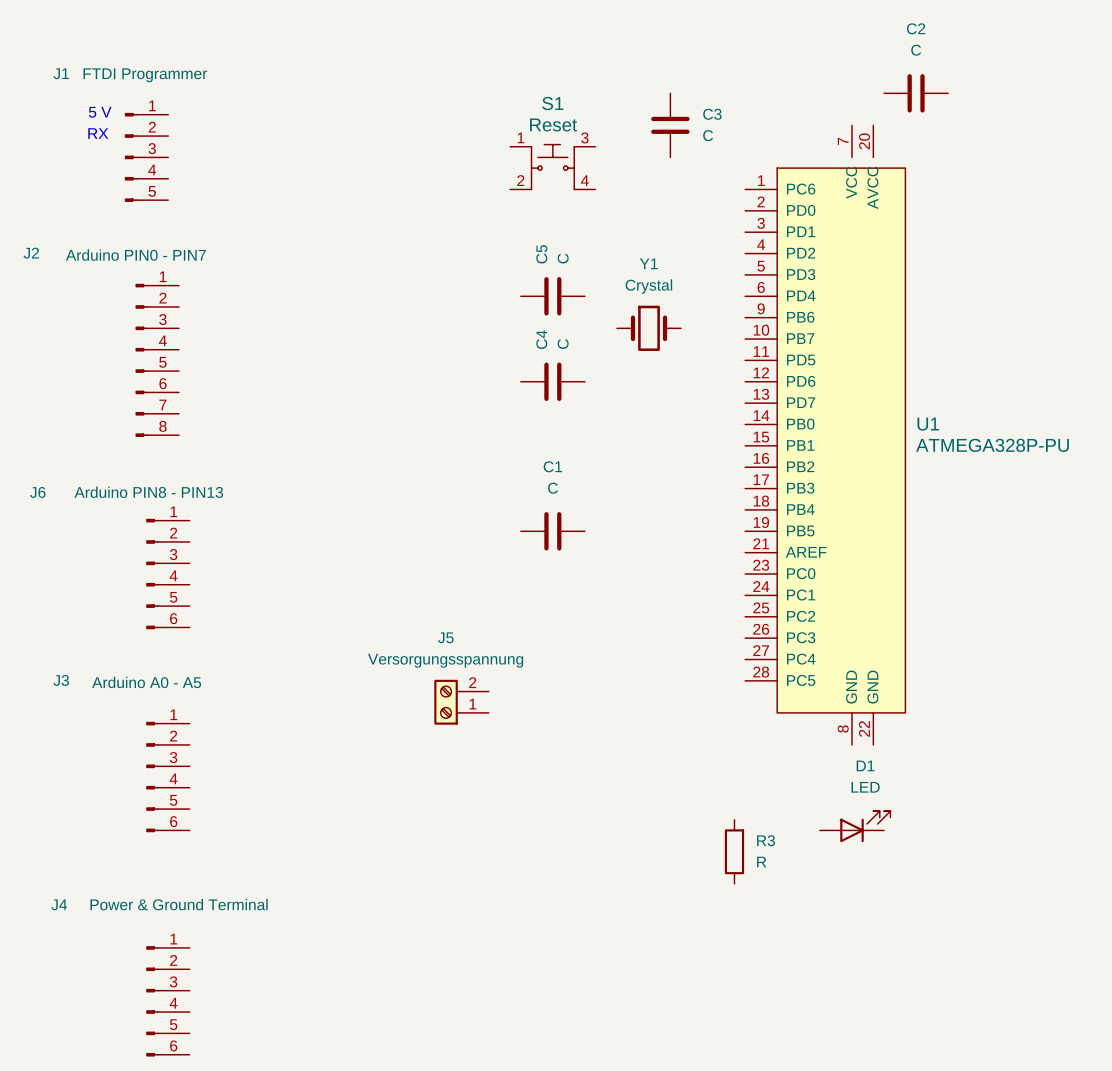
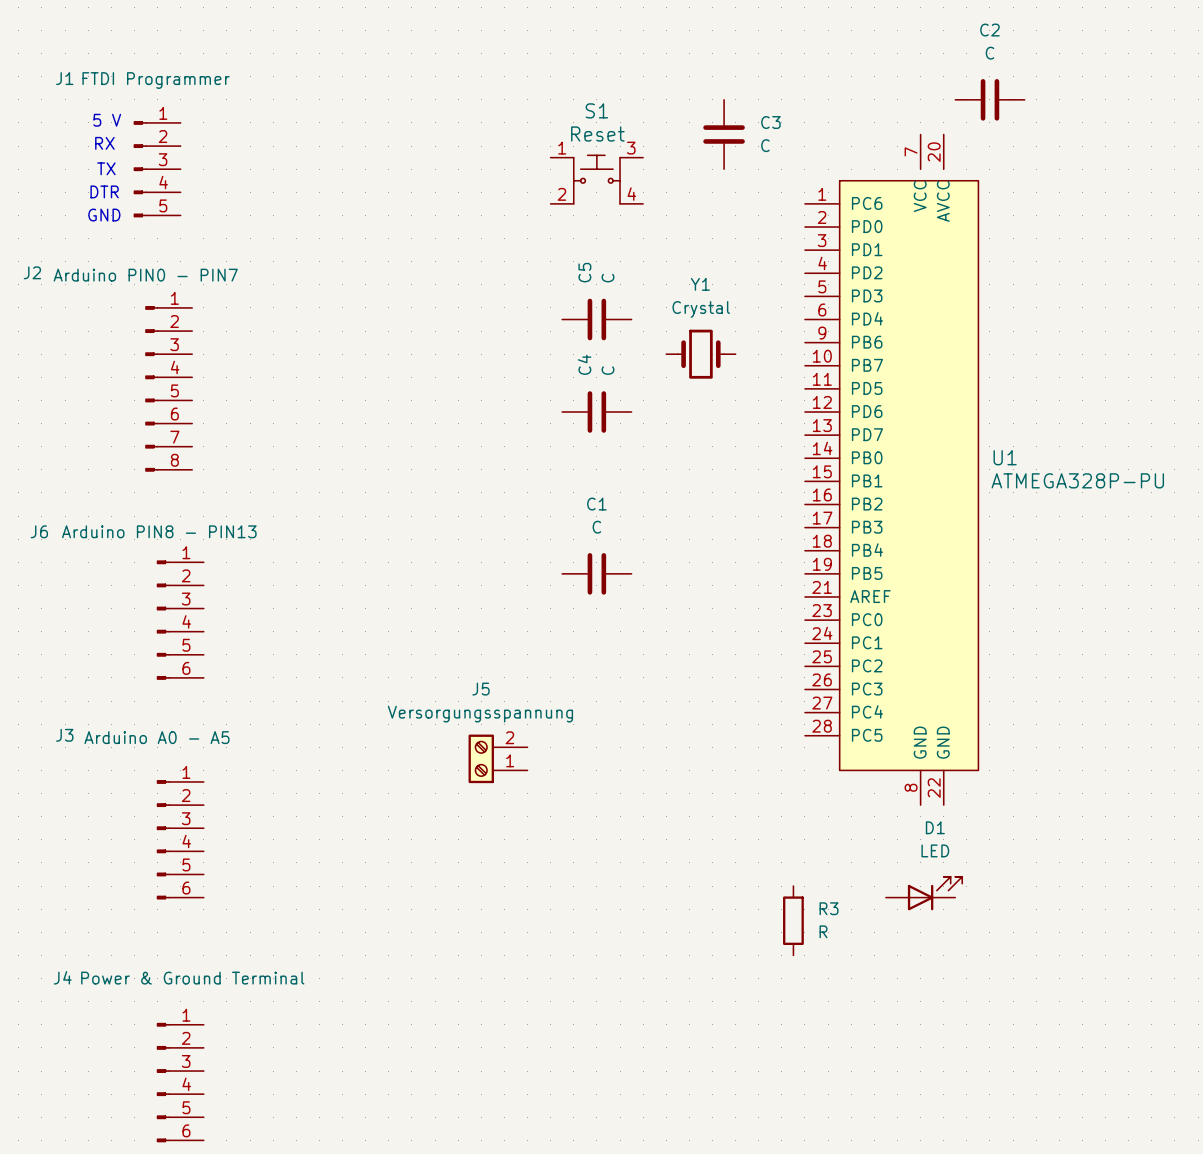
text: none -> TX (106, 168)
text: none -> DTR (104, 191)
text: none -> GND (104, 215)

